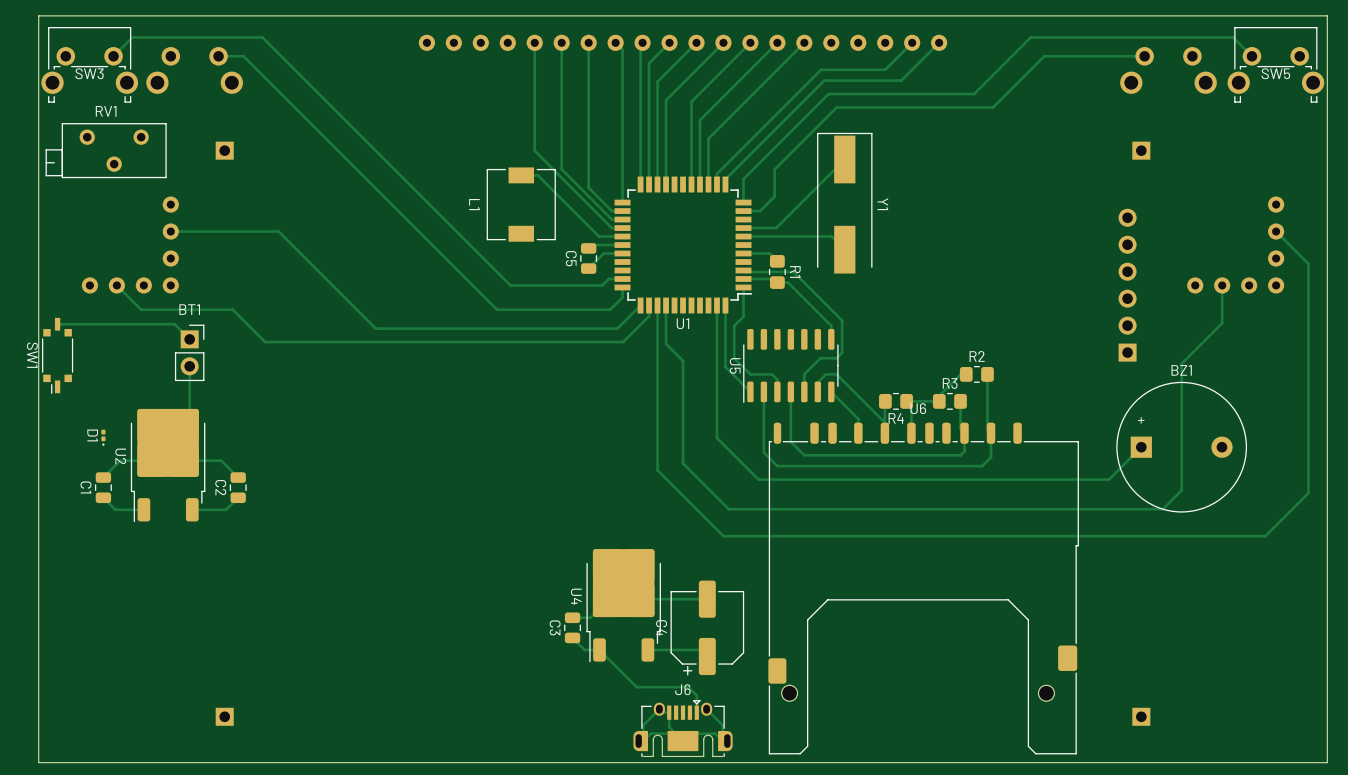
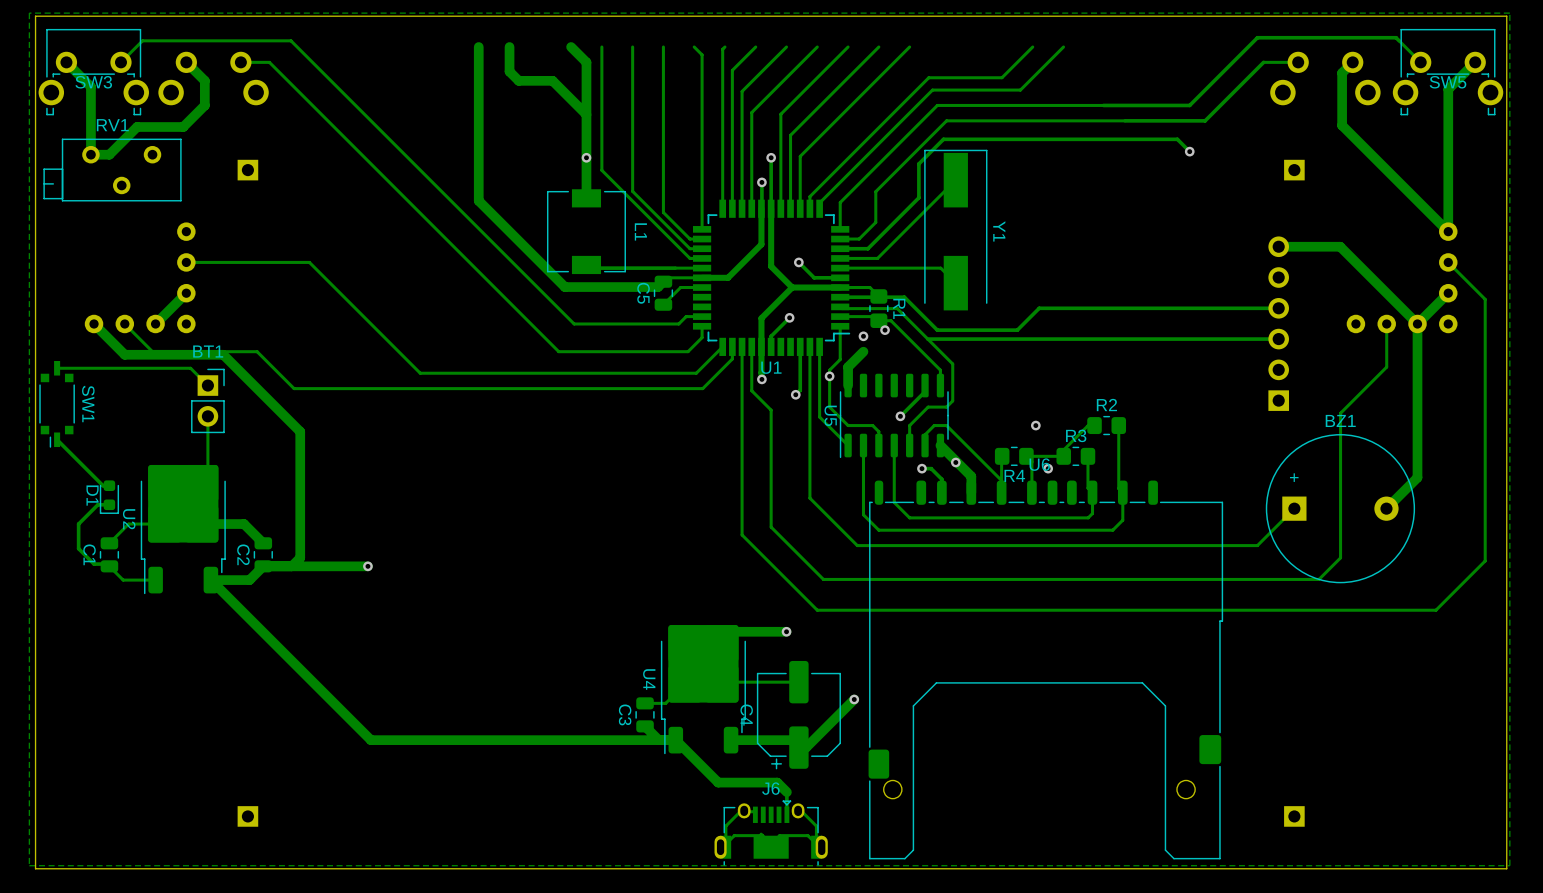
zone outline: none -> (1509, 13) (1509, 865) (29, 865) (29, 13) (1509, 13)
track: (1233, 37) (1030, 37) (974, 94) -> (1399, 40) (1396, 37) (1257, 37) (1189, 105) (1103, 105)
track: none -> (478, 46) (478, 200) (564, 287) (658, 287) (663, 281)
track: none -> (509, 46) (509, 71) (518, 80) (552, 80) (586, 114)
track: none -> (571, 46) (586, 62) (586, 198)
part: (683, 42) -> none
track: none -> (186, 62) (204, 80) (204, 105) (183, 127) (137, 127) (109, 154) (90, 154) (90, 86) (66, 62)
track: (1114, 56) (1044, 56) (993, 107) -> (1263, 62) (1205, 120) (1125, 120)
track: none -> (1475, 62) (1448, 89) (1448, 231) (1342, 125) (1342, 72) (1352, 62)
track: none -> (1189, 151) (1177, 139) (943, 139) (918, 163) (918, 197) (867, 248) (840, 248)
via: none -> (1189, 151)
via: none -> (586, 157)
track: none -> (771, 157) (771, 266) (792, 287)
via: none -> (771, 157)
track: none -> (761, 182) (761, 244) (728, 277) (702, 277)
via: none -> (761, 182)
track: (521, 175) (537, 175) (599, 236) -> (586, 264) (589, 268) (675, 268)
L1 name position: L1 (474, 204) -> L1 (640, 231)
track: none -> (1278, 246) (1340, 246) (1417, 323)
track: none -> (798, 262) (814, 277) (840, 277)
via: none -> (798, 262)
track: none -> (792, 287) (761, 318) (761, 379)
track: none -> (840, 287) (792, 287)
track: none -> (186, 293) (155, 323)
track: none -> (1448, 293) (1417, 323)
track: none -> (840, 297) (904, 297) (937, 330) (1017, 330) (1039, 308) (1278, 308)
track: none -> (789, 317) (771, 336) (771, 346)
via: none -> (789, 317)
track: none -> (94, 323) (124, 354) (223, 354) (300, 431) (300, 557) (291, 566)
track: none -> (1417, 323) (1417, 477) (1386, 508)
via: none -> (885, 330)
via: none -> (863, 336)
track: none -> (1278, 339) (927, 339)
track: none -> (800, 346) (800, 390) (795, 394)
track: none -> (863, 351) (848, 367) (848, 385)
via: none -> (829, 376)
via: none -> (761, 379)
track: none -> (925, 385) (925, 391) (900, 416)
via: none -> (795, 394)
SW1 name position: SW1 (32, 355) -> SW1 (88, 403)
via: none -> (900, 416)
via: none -> (1035, 425)
track: none -> (57, 439) (103, 485) (109, 485)
track width: thin (831, 391) (858, 418) (858, 433) -> thick (940, 445) (971, 476) (971, 492)
via: none -> (955, 462)
track: none -> (921, 468) (931, 468) (941, 479) (941, 492)
via: none -> (921, 468)
via: none -> (1048, 468)
D1 footprint: [101, 429, 106, 446] -> [99, 480, 120, 514]
track: none -> (109, 504) (97, 504) (78, 524) (78, 548) (94, 564) (107, 564) (109, 566)
track width: thin (184, 460) (221, 460) (238, 477) -> thick (201, 524) (244, 524) (263, 543)
track width: thin (238, 497) (226, 509) (192, 509) -> thick (263, 566) (249, 580) (210, 580)
track: none -> (367, 566) (263, 566)
via: none -> (367, 566)
track: none -> (210, 580) (370, 740) (658, 740)
track: none -> (786, 631) (735, 631) (703, 663)
via: none -> (786, 631)
track: none -> (854, 699) (806, 747) (798, 747)
via: none -> (854, 699)
track width: thin (572, 637) (584, 649) (599, 649) (636, 687) (688, 687) (696, 695) (696, 712) -> thick (645, 726) (658, 740) (675, 740) (718, 782) (777, 782) (786, 792) (786, 811)
track width: thin (647, 649) (700, 649) (707, 656) -> thick (731, 740) (791, 740) (798, 747)
J6 footprint: [633, 700, 733, 758] -> [714, 800, 828, 866]
track: (669, 712) (669, 727) (674, 732) -> none

